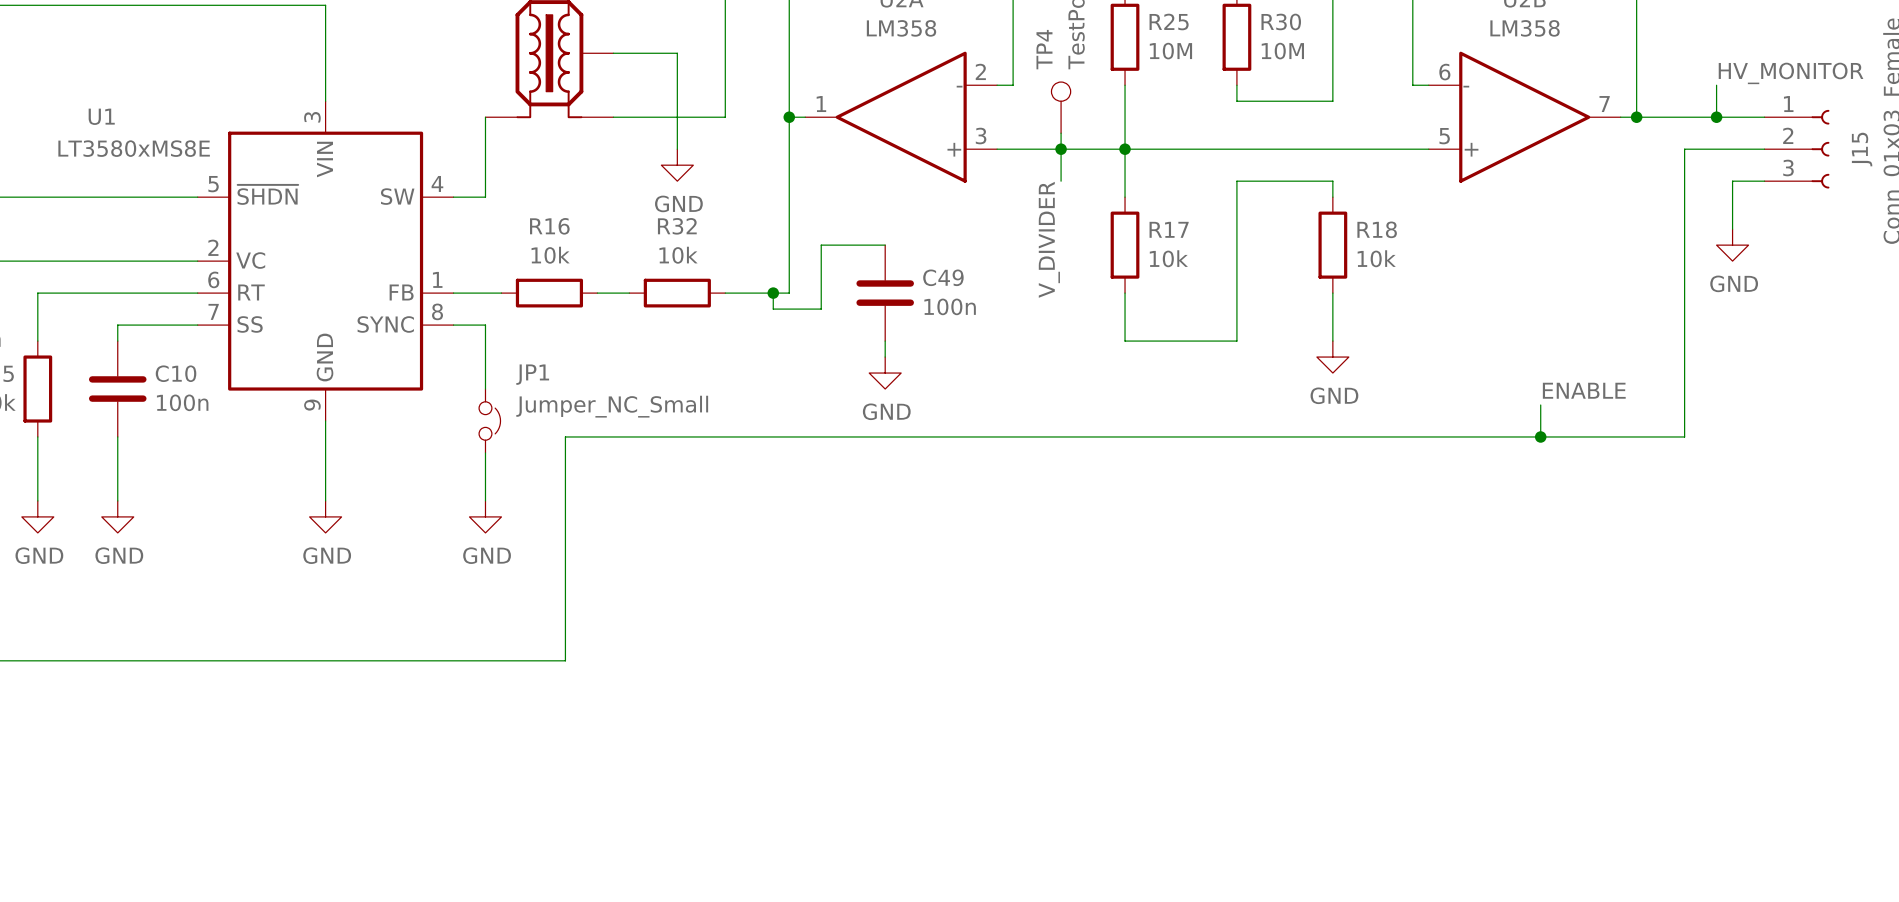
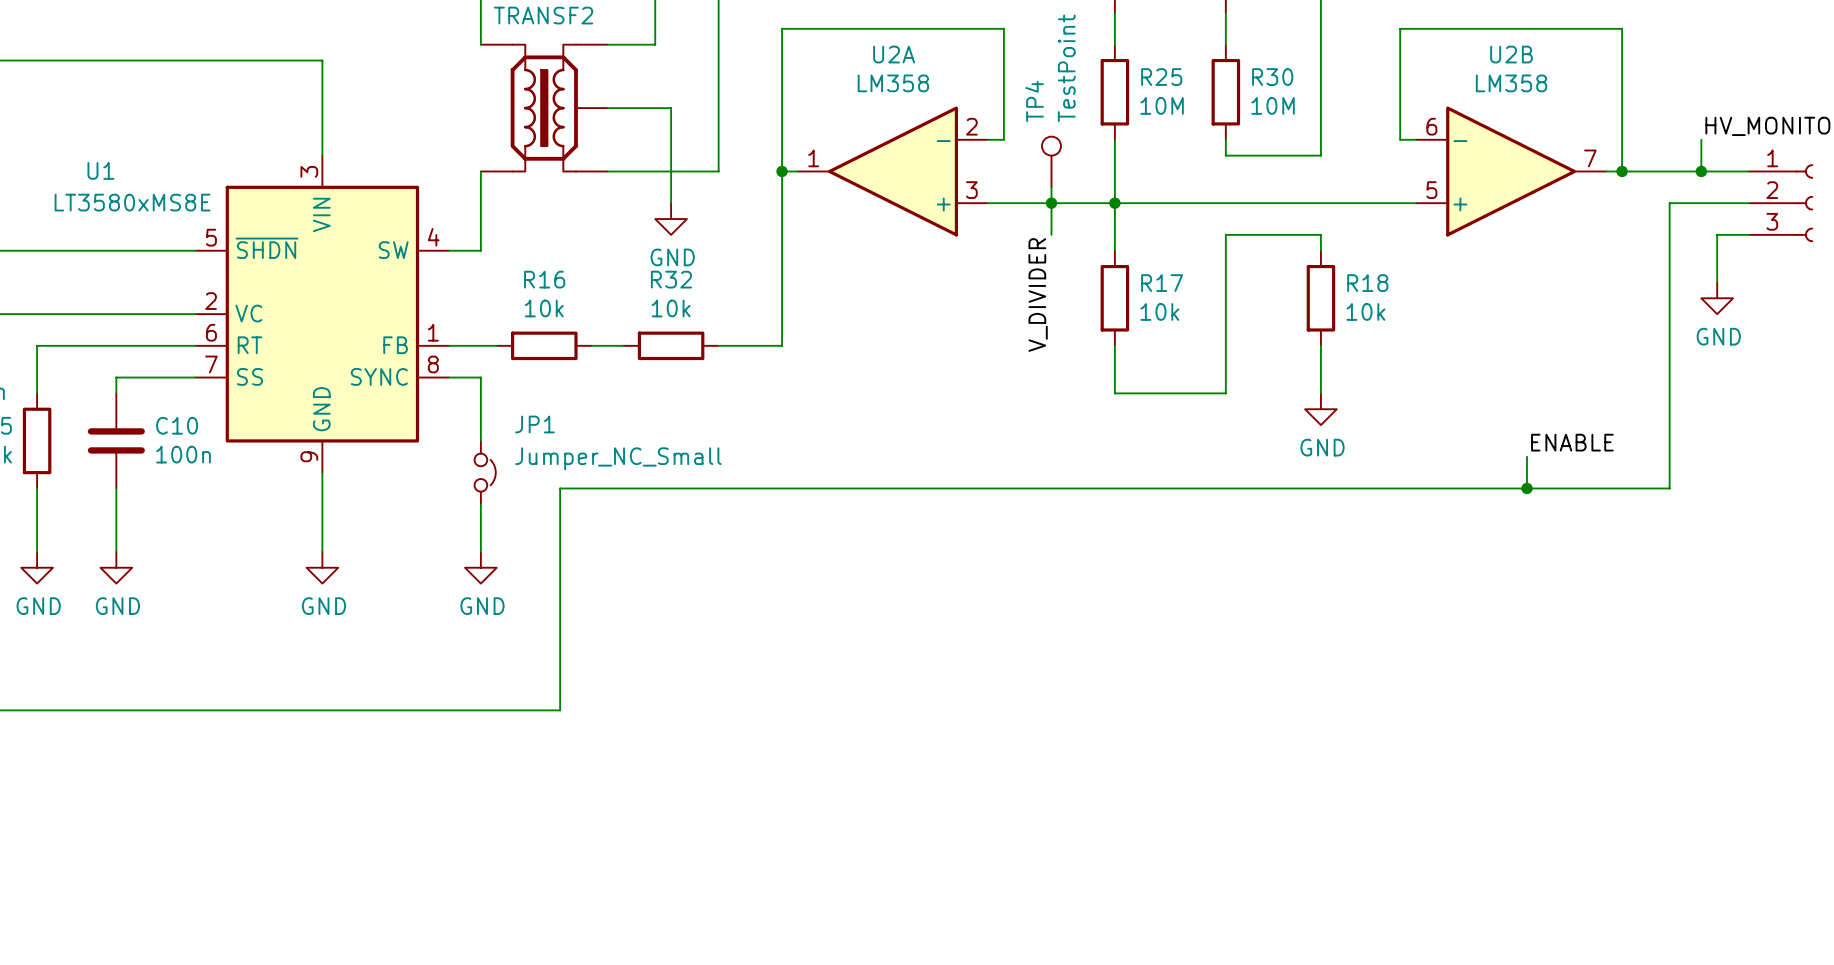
wire: (885, 245) (821, 245) (821, 309) (773, 309) (773, 293) -> none
junction: (773, 293) -> none
C49: 100n (885, 293) -> none
wire: (885, 341) (885, 357) -> none
power symbol: GND (885, 373) -> none

